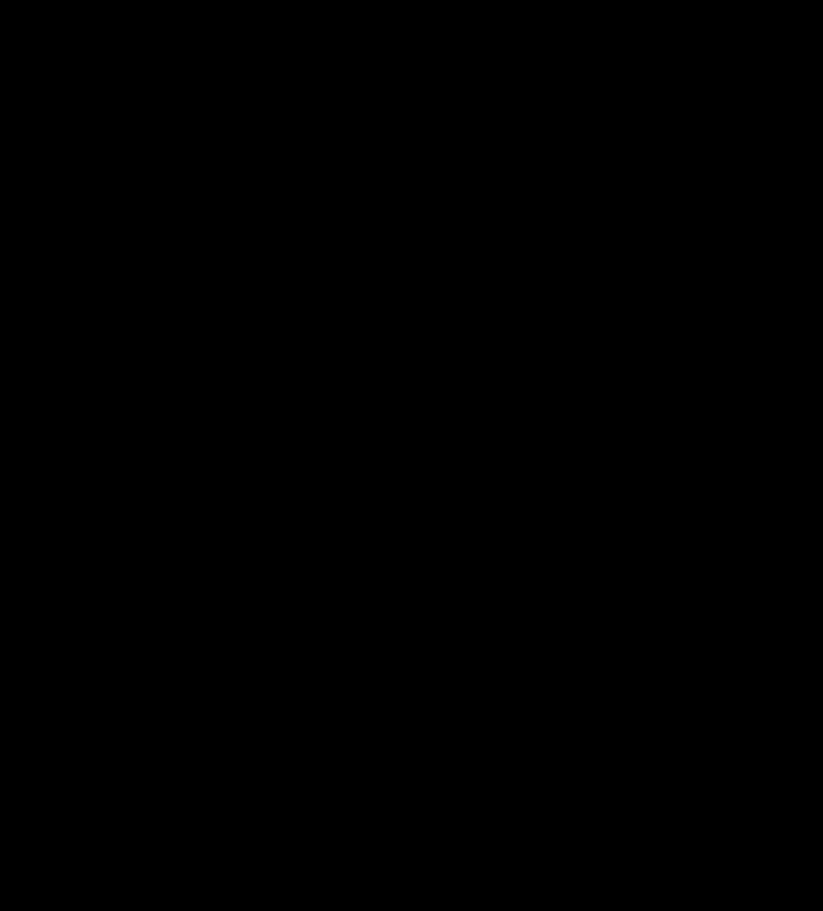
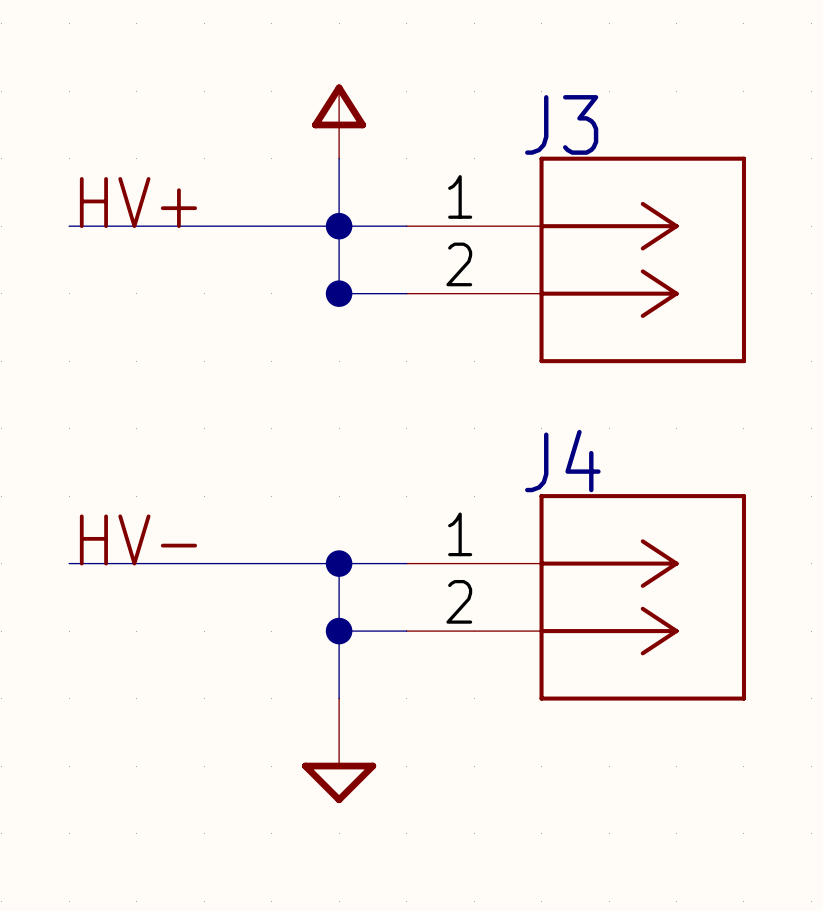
power symbol: none -> (339, 121)
wire: none -> (339, 158) (339, 293) (406, 293)
label: none -> HV+ (138, 202)
wire: none -> (69, 226) (406, 226)
junction: none -> (339, 226)
J3: none -> (576, 259)
junction: none -> (339, 293)
label: none -> HV- (138, 539)
wire: none -> (69, 563) (406, 563)
wire: none -> (339, 563) (339, 698)
junction: none -> (339, 563)
J4: none -> (576, 597)
wire: none -> (339, 631) (406, 631)
junction: none -> (339, 631)
power symbol: none -> (339, 750)

